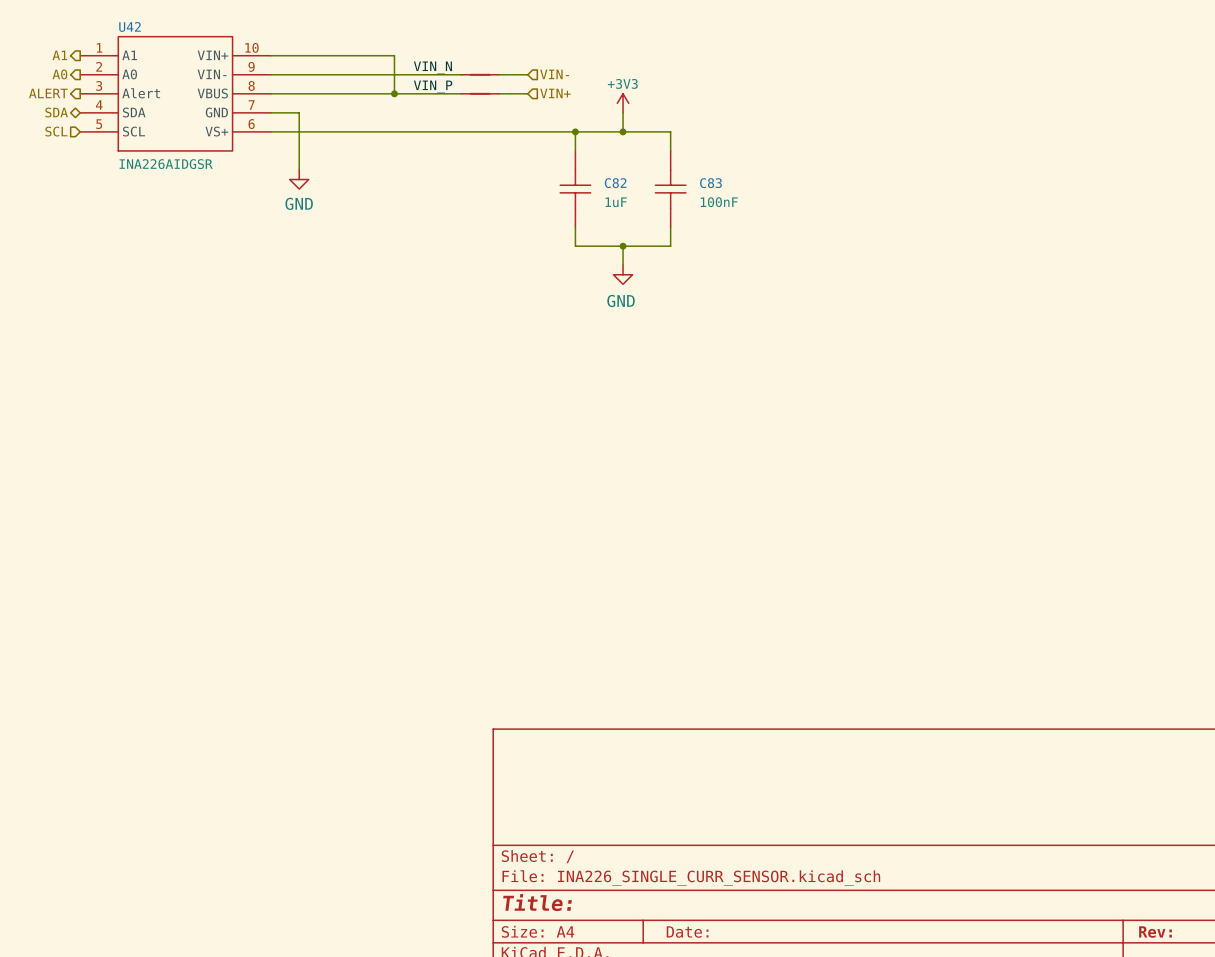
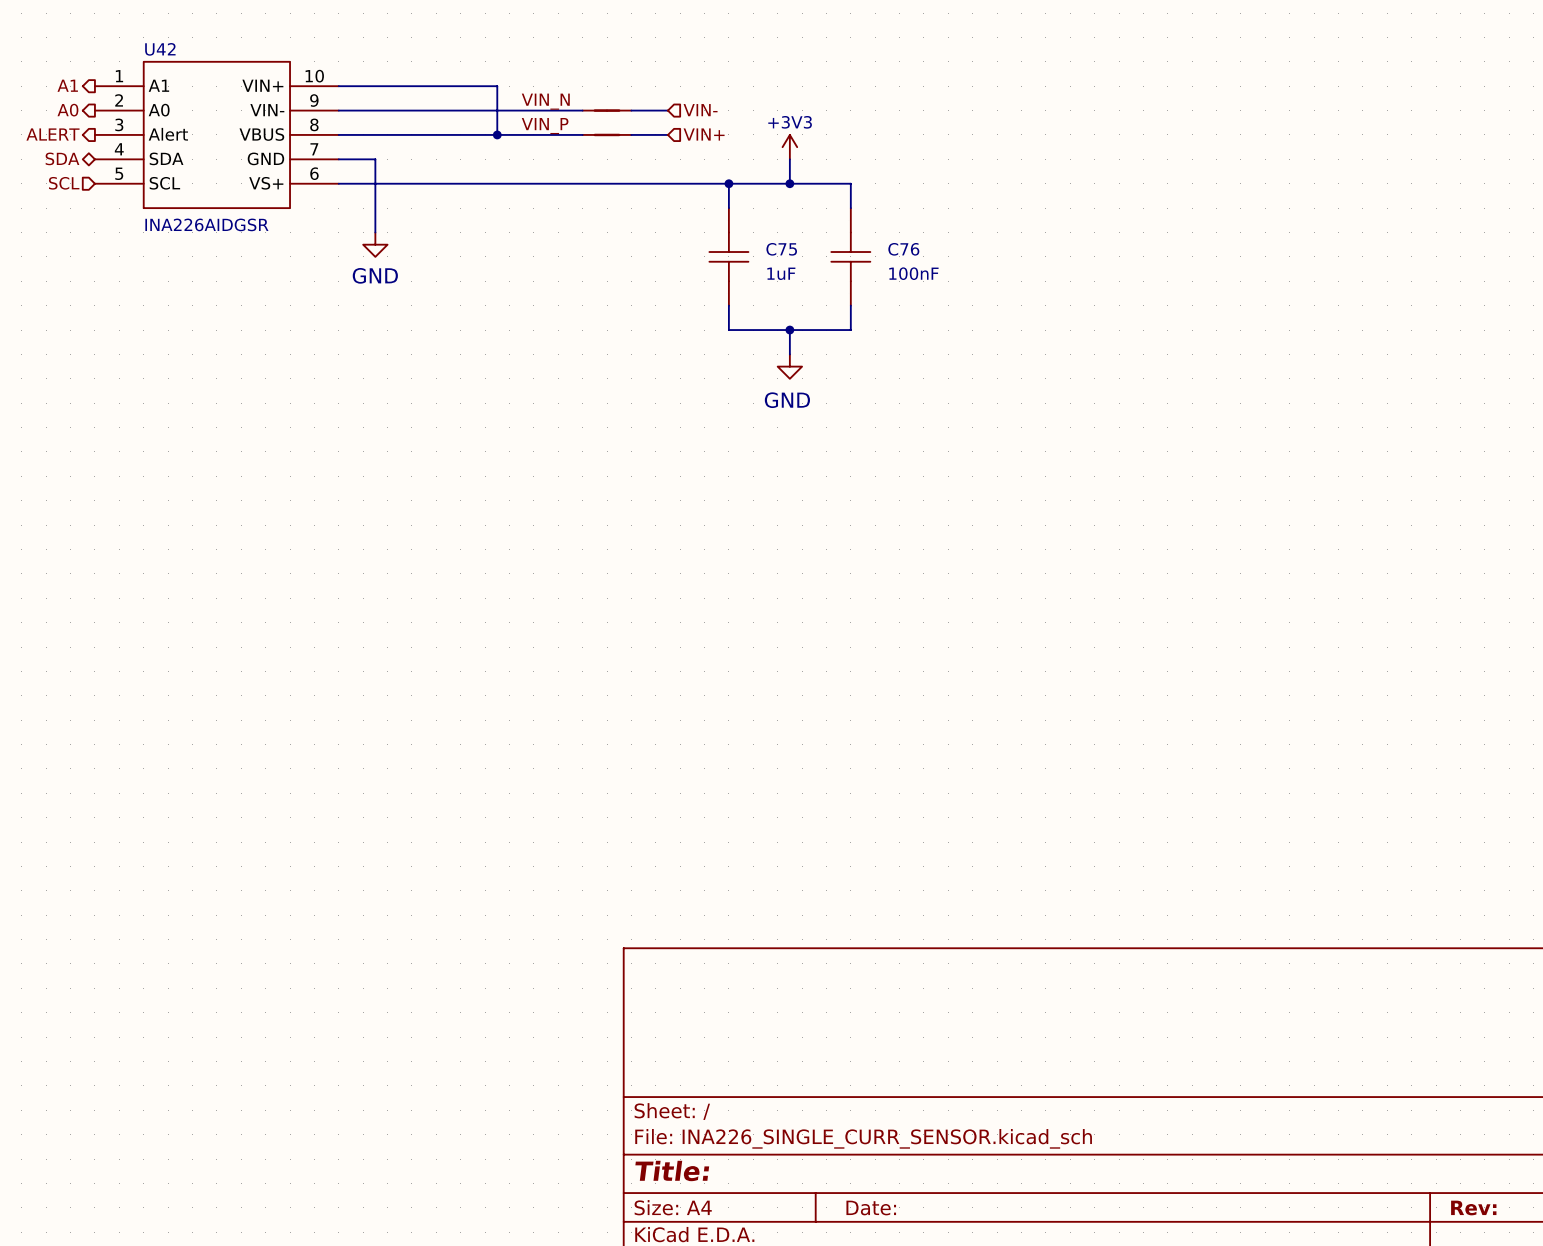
C82 name: C82 (615, 183) -> C75 (781, 249)
C83 name: C83 (710, 183) -> C76 (903, 249)

